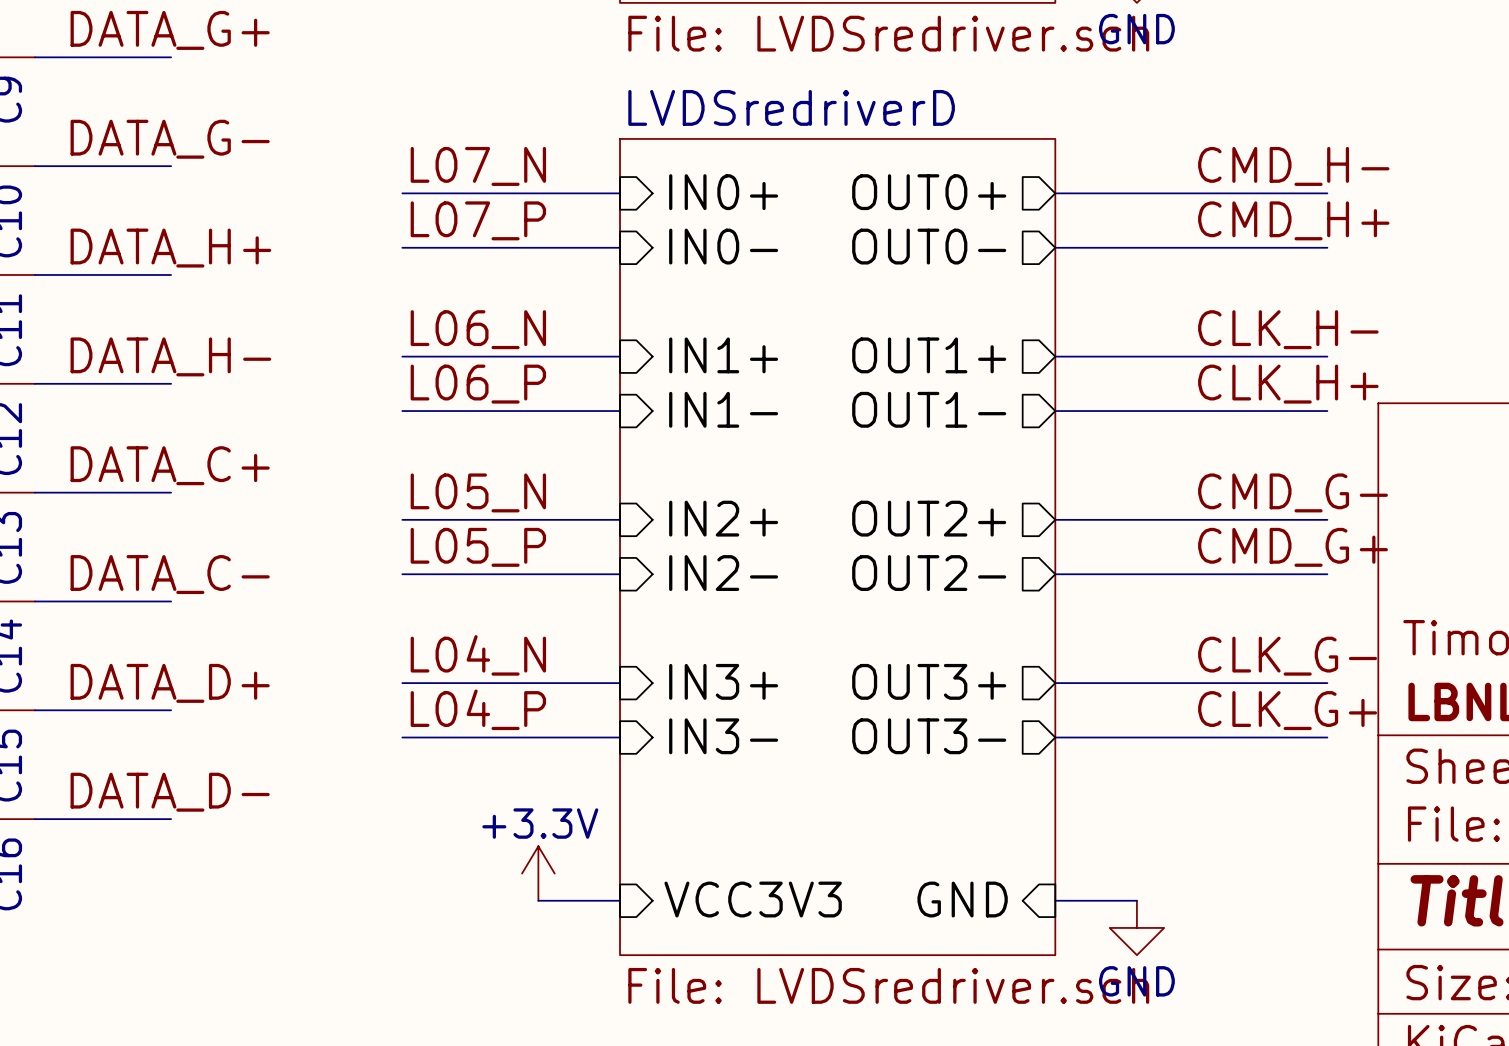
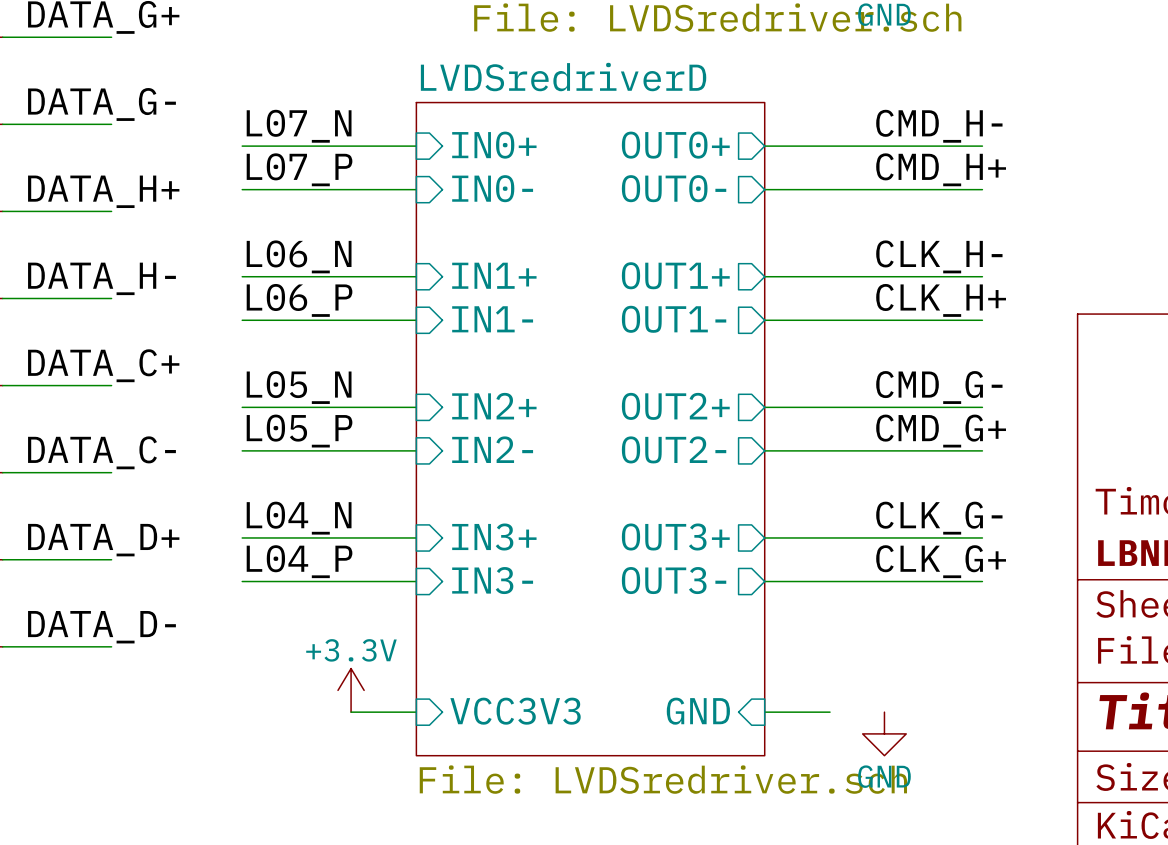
label position: L07_N (478, 166) -> L07_N (299, 126)
label position: CMD_H- (1293, 166) -> CMD_H- (939, 126)
sheet pin position: IN0+ (723, 192) -> IN0+ (494, 145)
sheet pin position: OUT0+ (929, 192) -> OUT0+ (675, 145)
wire: none -> (242, 146) (296, 146)
wire: (551, 193) (620, 193) -> (764, 146) (819, 146)
wire: (1259, 193) (1327, 193) -> none
label position: L07_P (478, 220) -> L07_P (299, 169)
label position: CMD_H+ (1293, 220) -> CMD_H+ (941, 169)
sheet pin position: IN0- (723, 246) -> IN0- (492, 188)
sheet pin position: OUT0- (929, 246) -> OUT0- (674, 188)
wire: none -> (242, 189) (296, 189)
wire: (551, 247) (620, 247) -> (764, 189) (819, 189)
wire: (1259, 247) (1327, 247) -> none
label position: L06_N (478, 329) -> L06_N (299, 256)
label position: CLK_H- (1288, 329) -> CLK_H- (939, 256)
sheet pin position: IN1+ (723, 355) -> IN1+ (494, 275)
sheet pin position: OUT1+ (929, 355) -> OUT1+ (675, 275)
wire: none -> (242, 276) (296, 276)
wire: (551, 356) (620, 356) -> (764, 276) (819, 276)
wire: (1259, 356) (1327, 356) -> none
label position: L06_P (478, 384) -> L06_P (299, 300)
label position: CLK_H+ (1288, 384) -> CLK_H+ (941, 300)
sheet pin position: IN1- (723, 409) -> IN1- (492, 319)
sheet pin position: OUT1- (929, 409) -> OUT1- (674, 319)
wire: none -> (242, 320) (296, 320)
wire: (551, 411) (620, 411) -> (764, 320) (819, 320)
wire: (1259, 411) (1327, 411) -> none
label position: L05_N (478, 492) -> L05_N (299, 387)
label position: CMD_G- (1293, 492) -> CMD_G- (939, 387)
sheet pin position: IN2+ (723, 518) -> IN2+ (494, 406)
sheet pin position: OUT2+ (929, 518) -> OUT2+ (675, 406)
wire: none -> (242, 407) (296, 407)
wire: (551, 519) (620, 519) -> (764, 407) (819, 407)
wire: (1259, 519) (1327, 519) -> none
label position: L05_P (478, 547) -> L05_P (299, 431)
sheet LVDSredriverD position: (837, 547) -> (590, 429)
label position: CMD_G+ (1293, 547) -> CMD_G+ (941, 431)
sheet pin position: IN2- (723, 573) -> IN2- (492, 449)
sheet pin position: OUT2- (929, 573) -> OUT2- (674, 449)
wire: none -> (242, 450) (296, 450)
wire: (551, 574) (620, 574) -> (764, 450) (819, 450)
wire: (1259, 574) (1327, 574) -> none
label position: L04_N (478, 655) -> L04_N (299, 518)
label position: CLK_G- (1287, 656) -> CLK_G- (939, 518)
sheet pin position: IN3+ (723, 681) -> IN3+ (494, 537)
sheet pin position: OUT3+ (929, 681) -> OUT3+ (675, 537)
wire: none -> (242, 537) (296, 537)
wire: (551, 683) (620, 683) -> (764, 537) (819, 537)
wire: (1259, 683) (1327, 683) -> none
label position: L04_P (478, 709) -> L04_P (299, 561)
label position: CLK_G+ (1287, 710) -> CLK_G+ (941, 561)
sheet pin position: IN3- (723, 736) -> IN3- (492, 580)
sheet pin position: OUT3- (929, 736) -> OUT3- (674, 580)
wire: none -> (242, 581) (296, 581)
wire: (551, 737) (620, 737) -> (764, 581) (819, 581)
wire: (1259, 737) (1327, 737) -> none
power symbol position: +3.3V (538, 873) -> +3.3V (351, 690)
sheet pin position: VCC3V3 (753, 899) -> VCC3V3 (515, 711)
sheet pin position: GND (962, 899) -> GND (698, 711)
wire: none -> (351, 712) (405, 712)
wire: (551, 900) (620, 900) -> (764, 712) (819, 712)
wire: (1068, 900) (1136, 900) -> none

